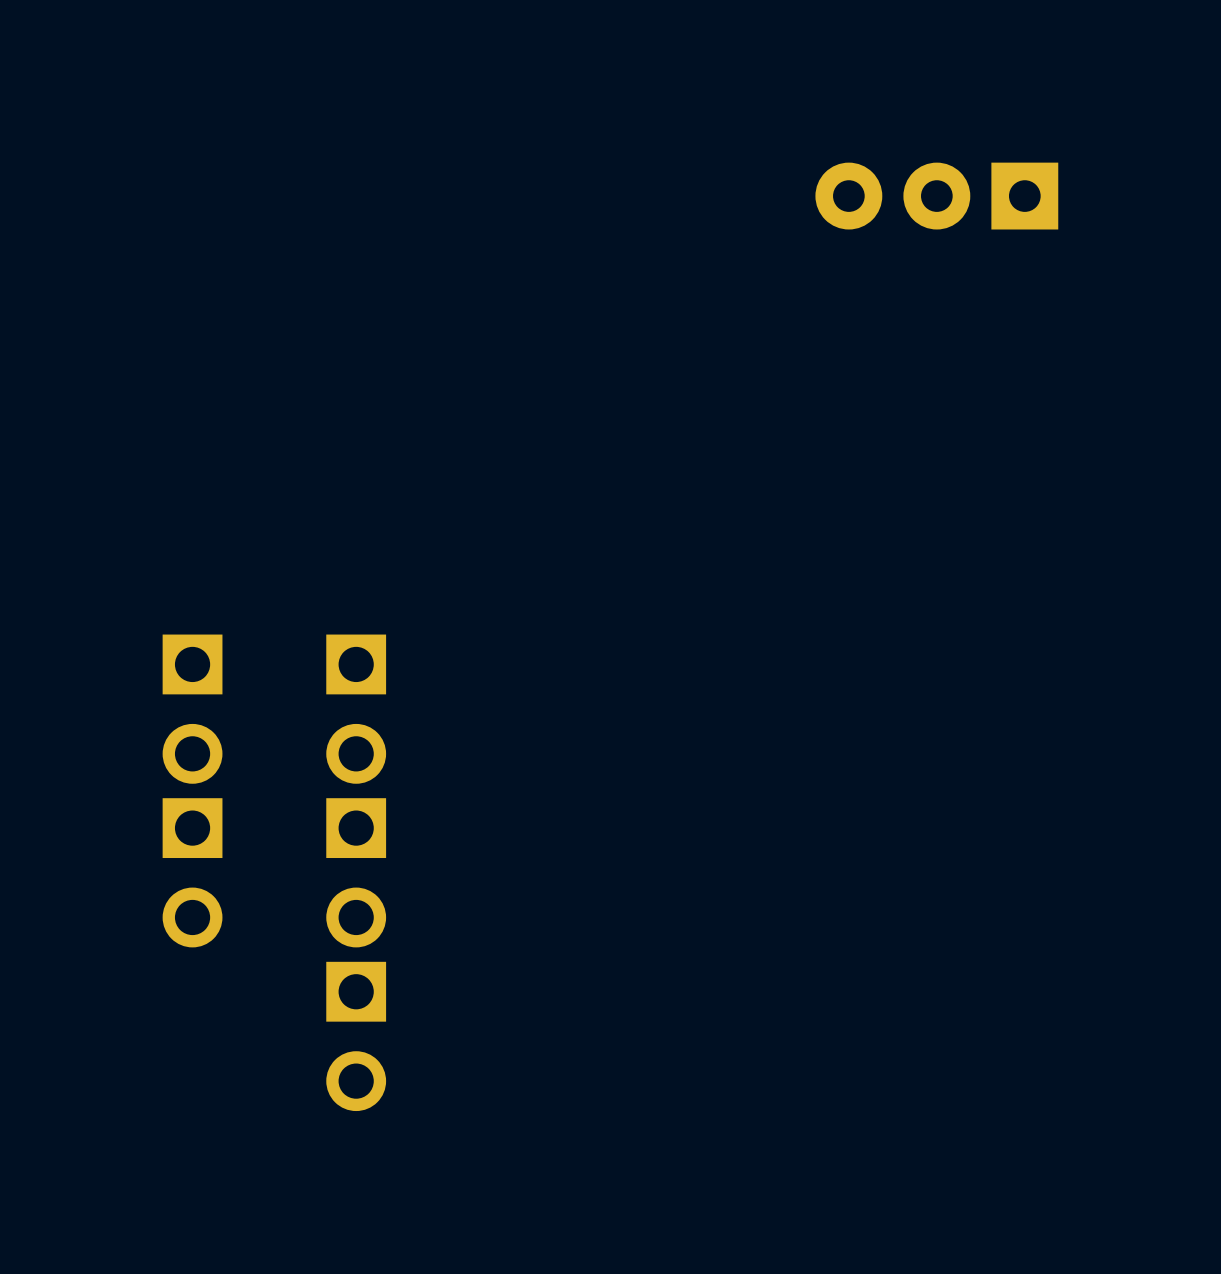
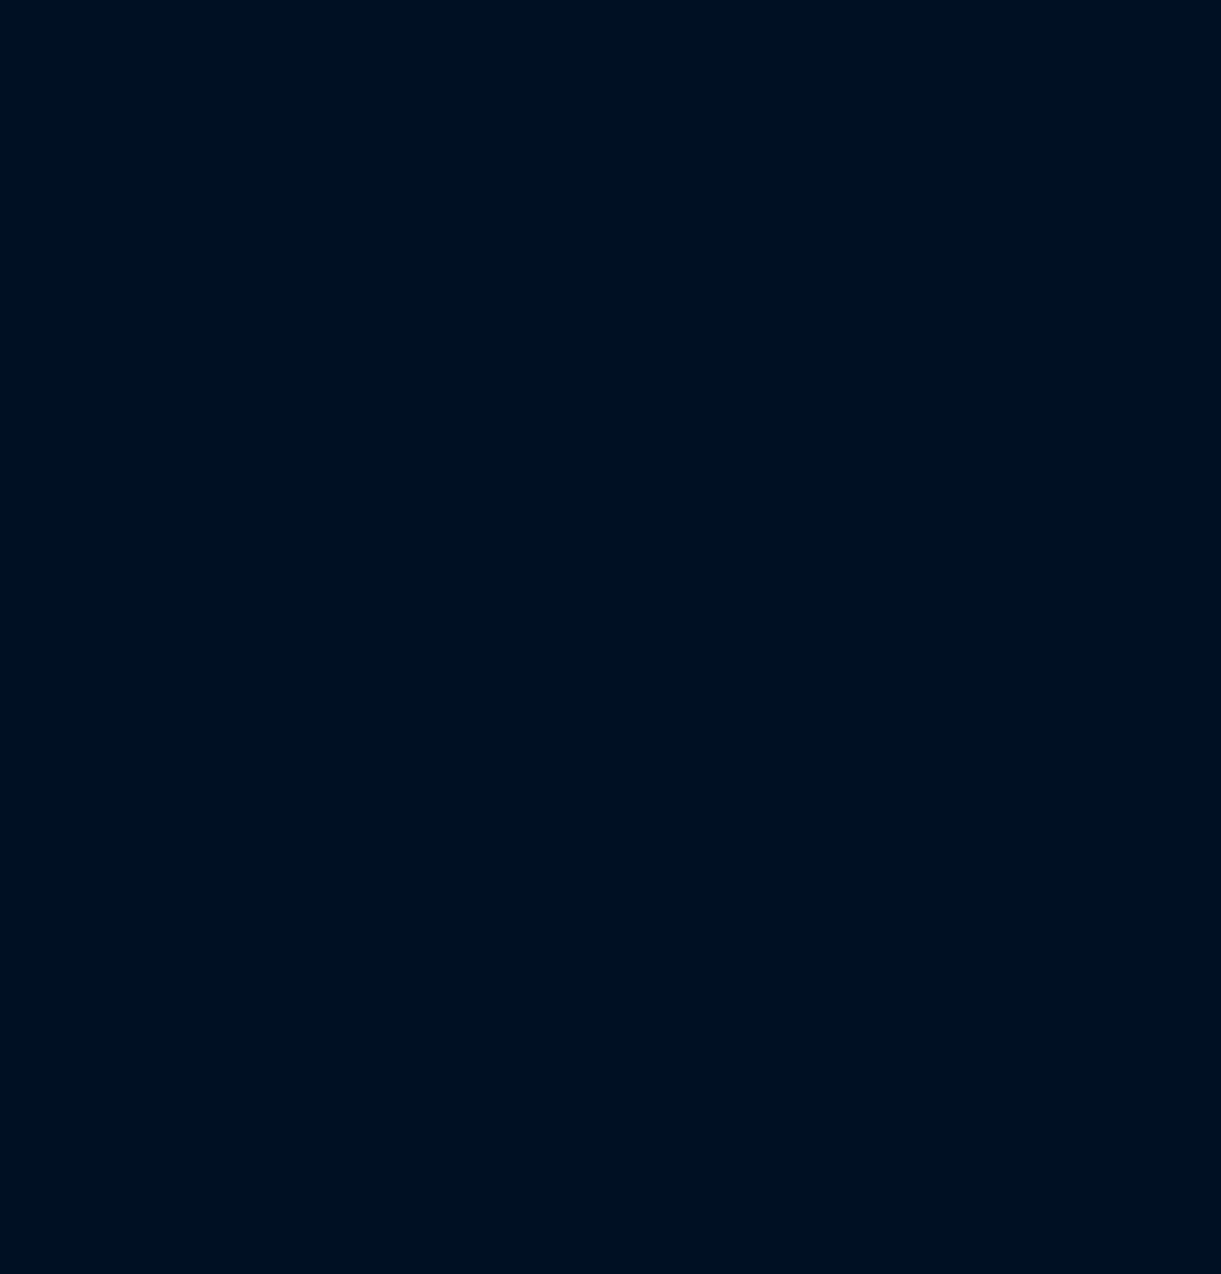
part: (936, 196) -> none
part: (192, 709) -> none
part: (356, 709) -> none
part: (192, 872) -> none
part: (356, 872) -> none
part: (356, 1036) -> none

